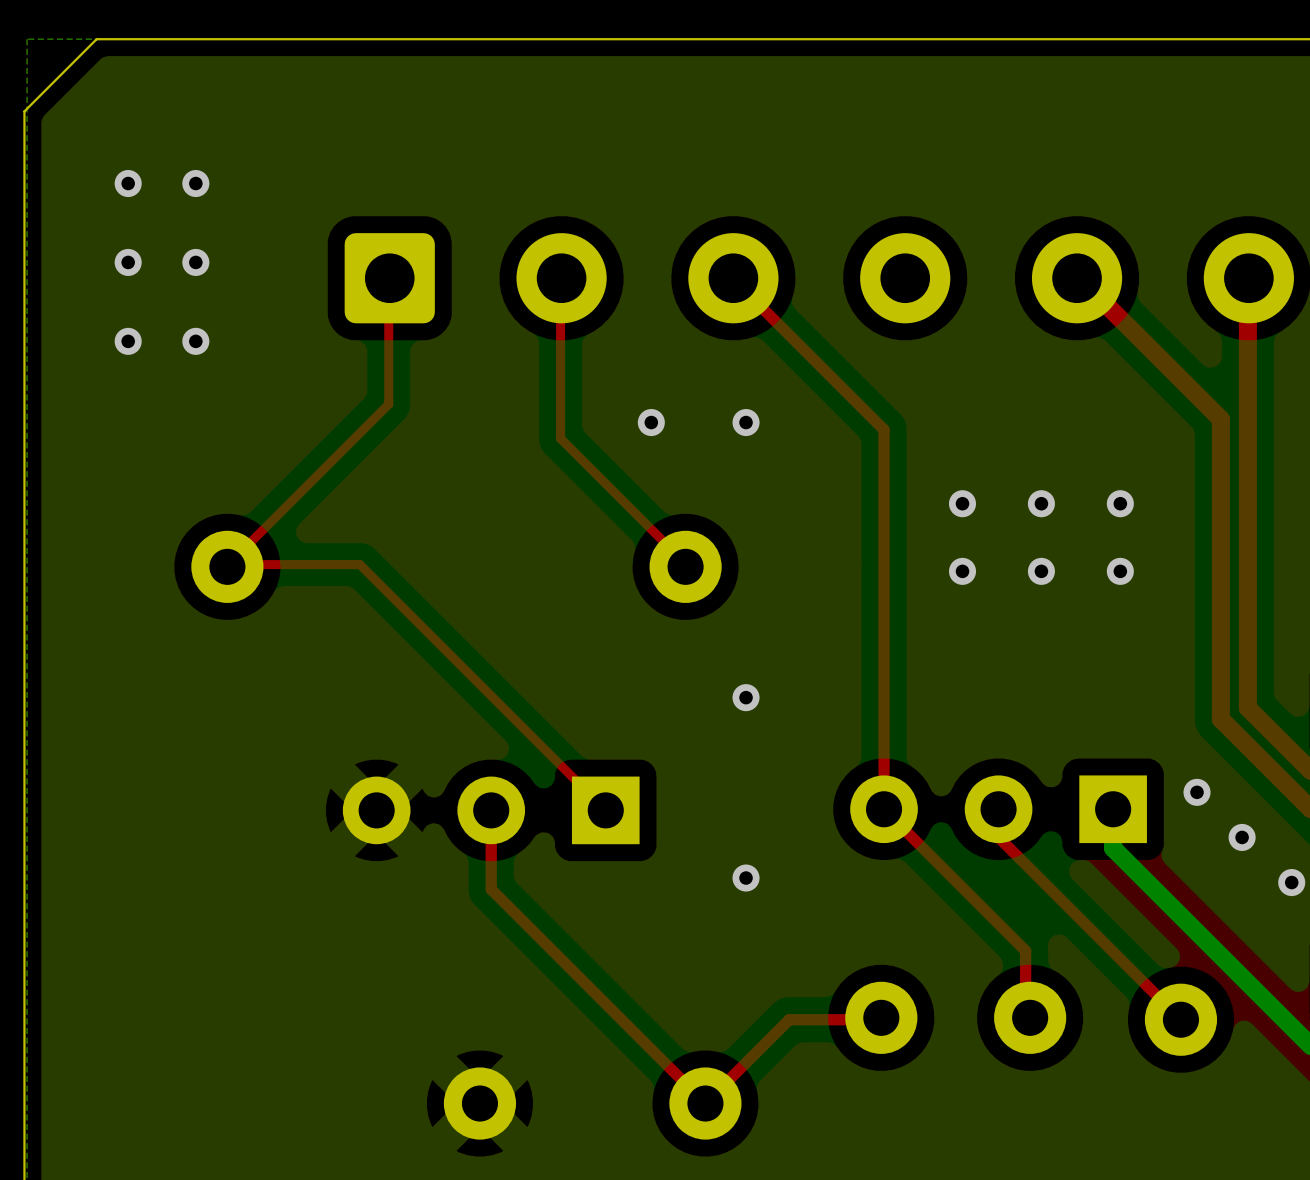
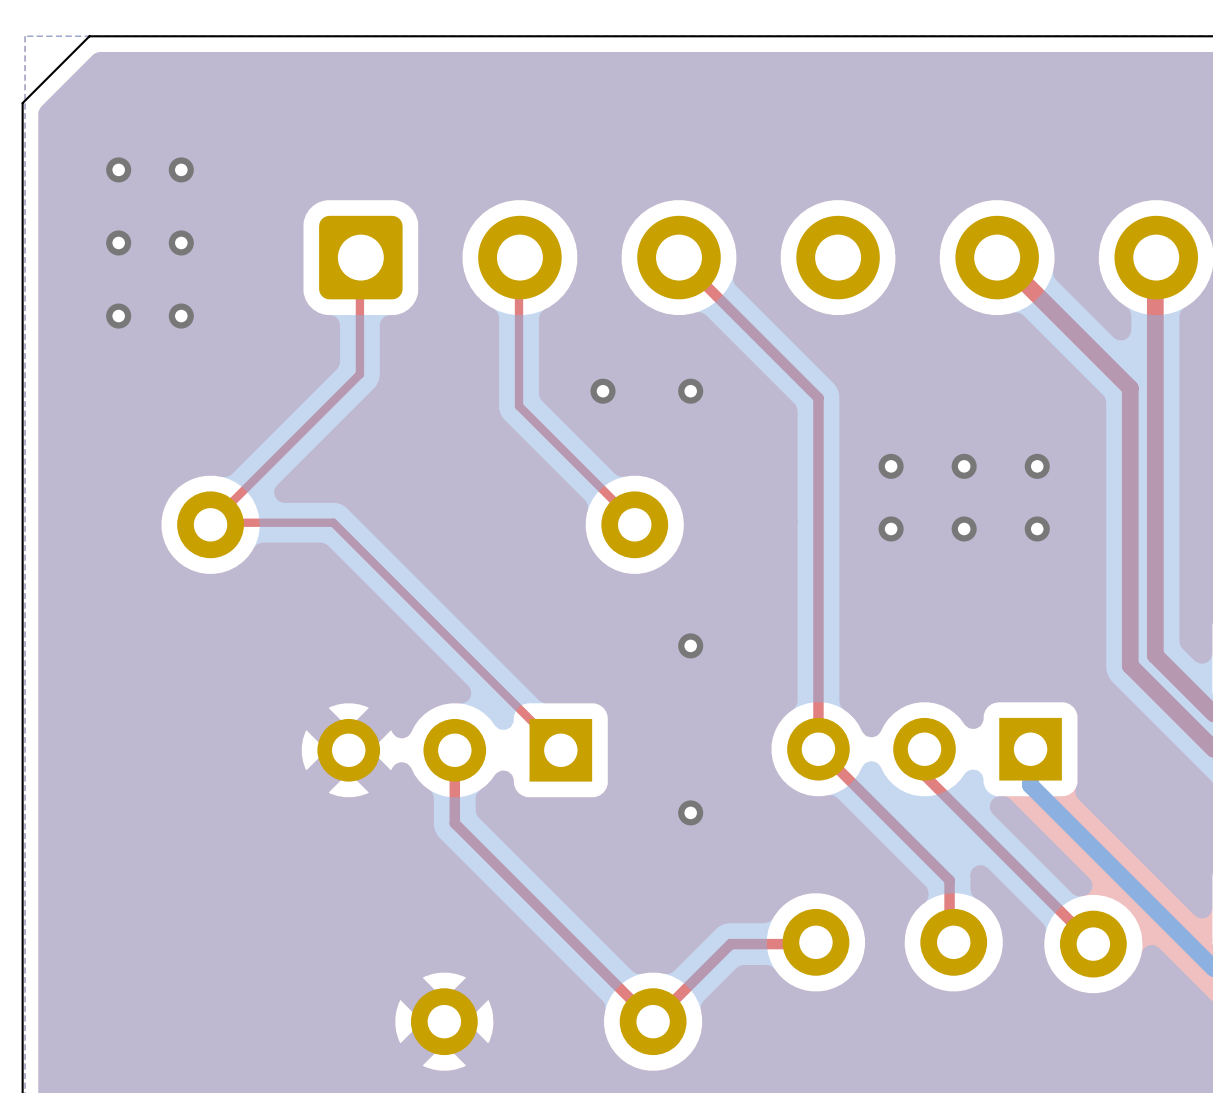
via: (1197, 792) -> none
via: (1242, 837) -> none
via: (1291, 882) -> none

